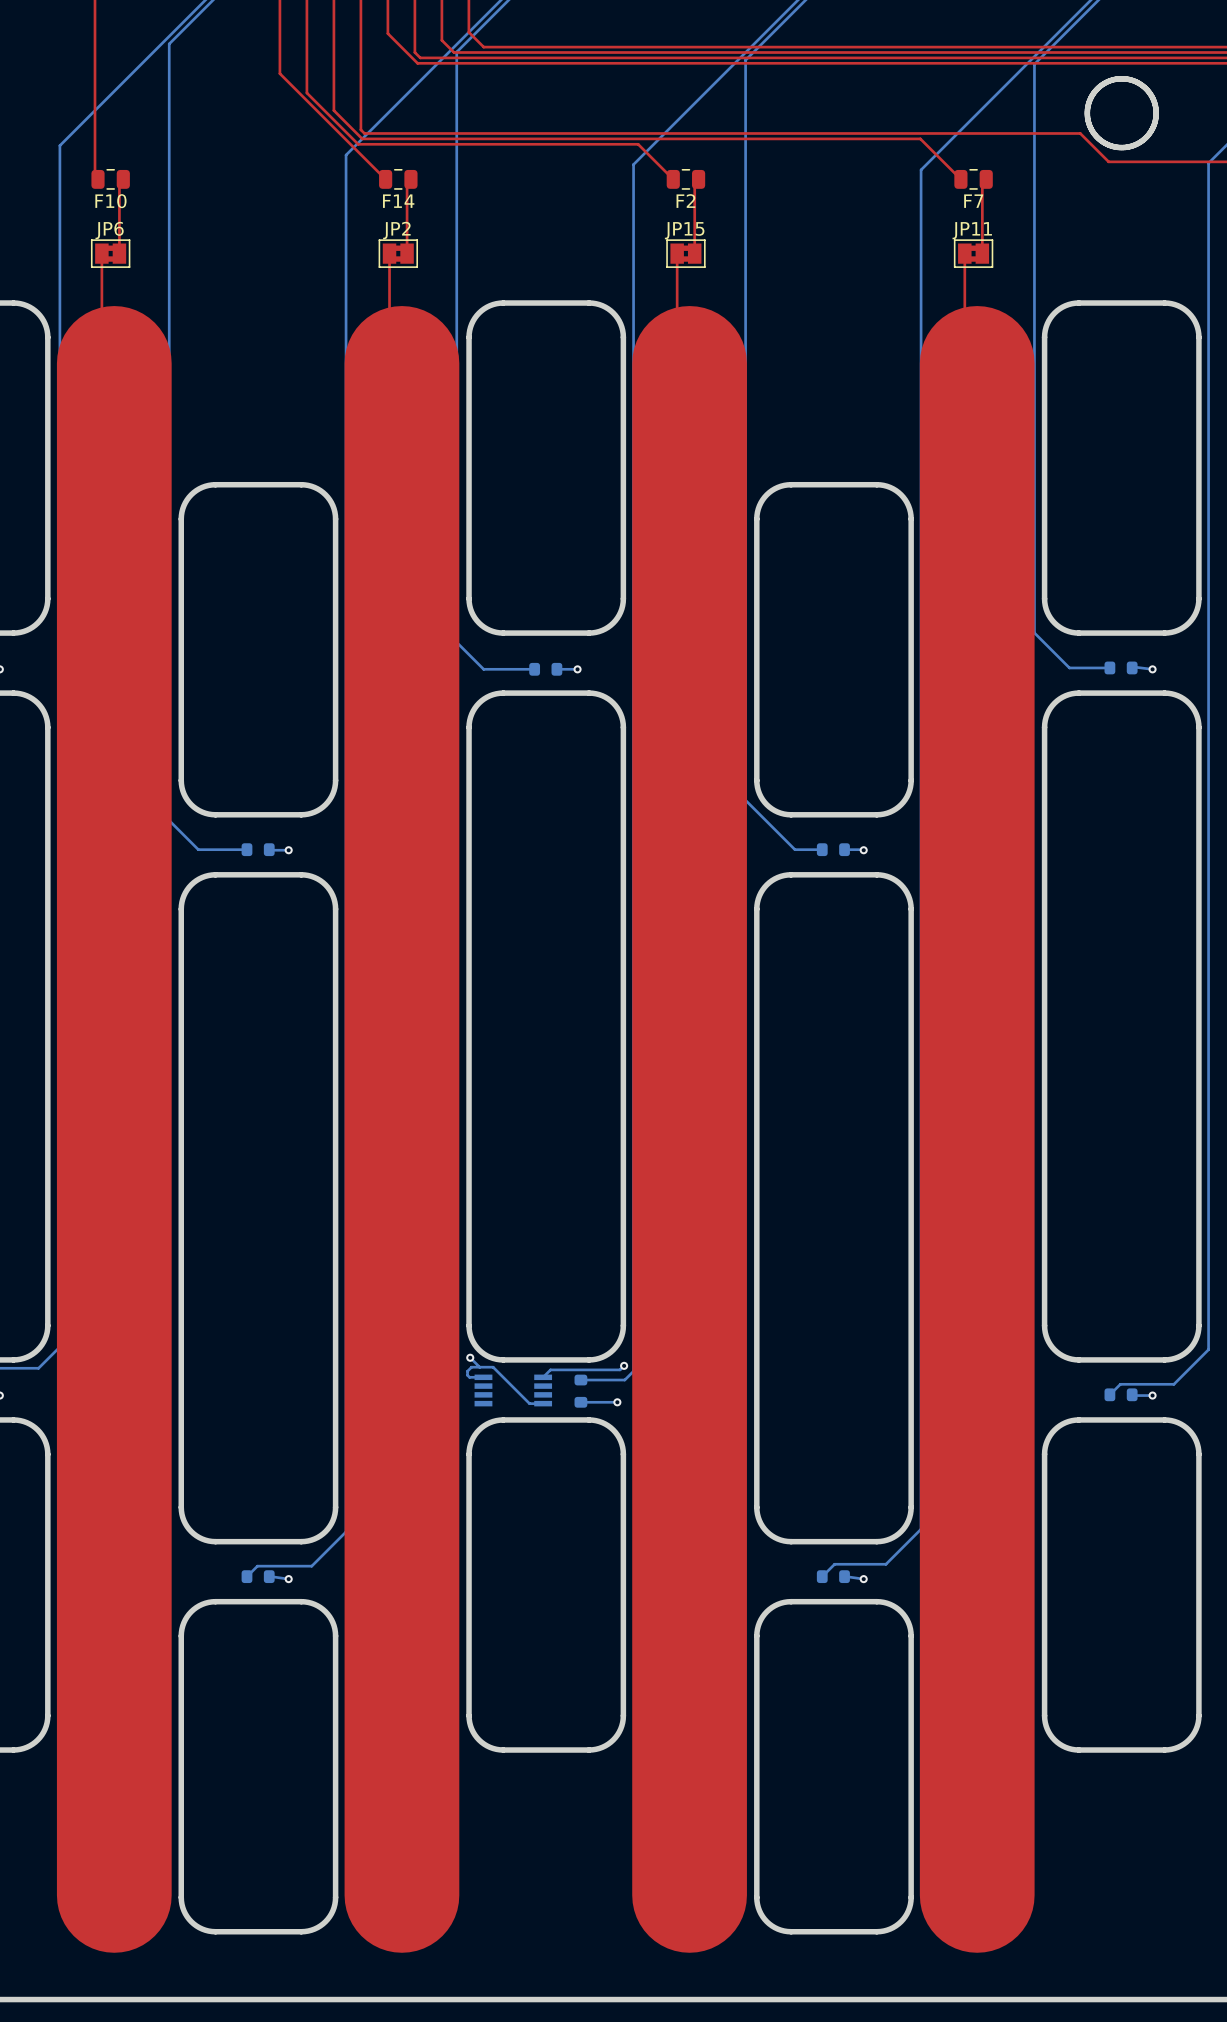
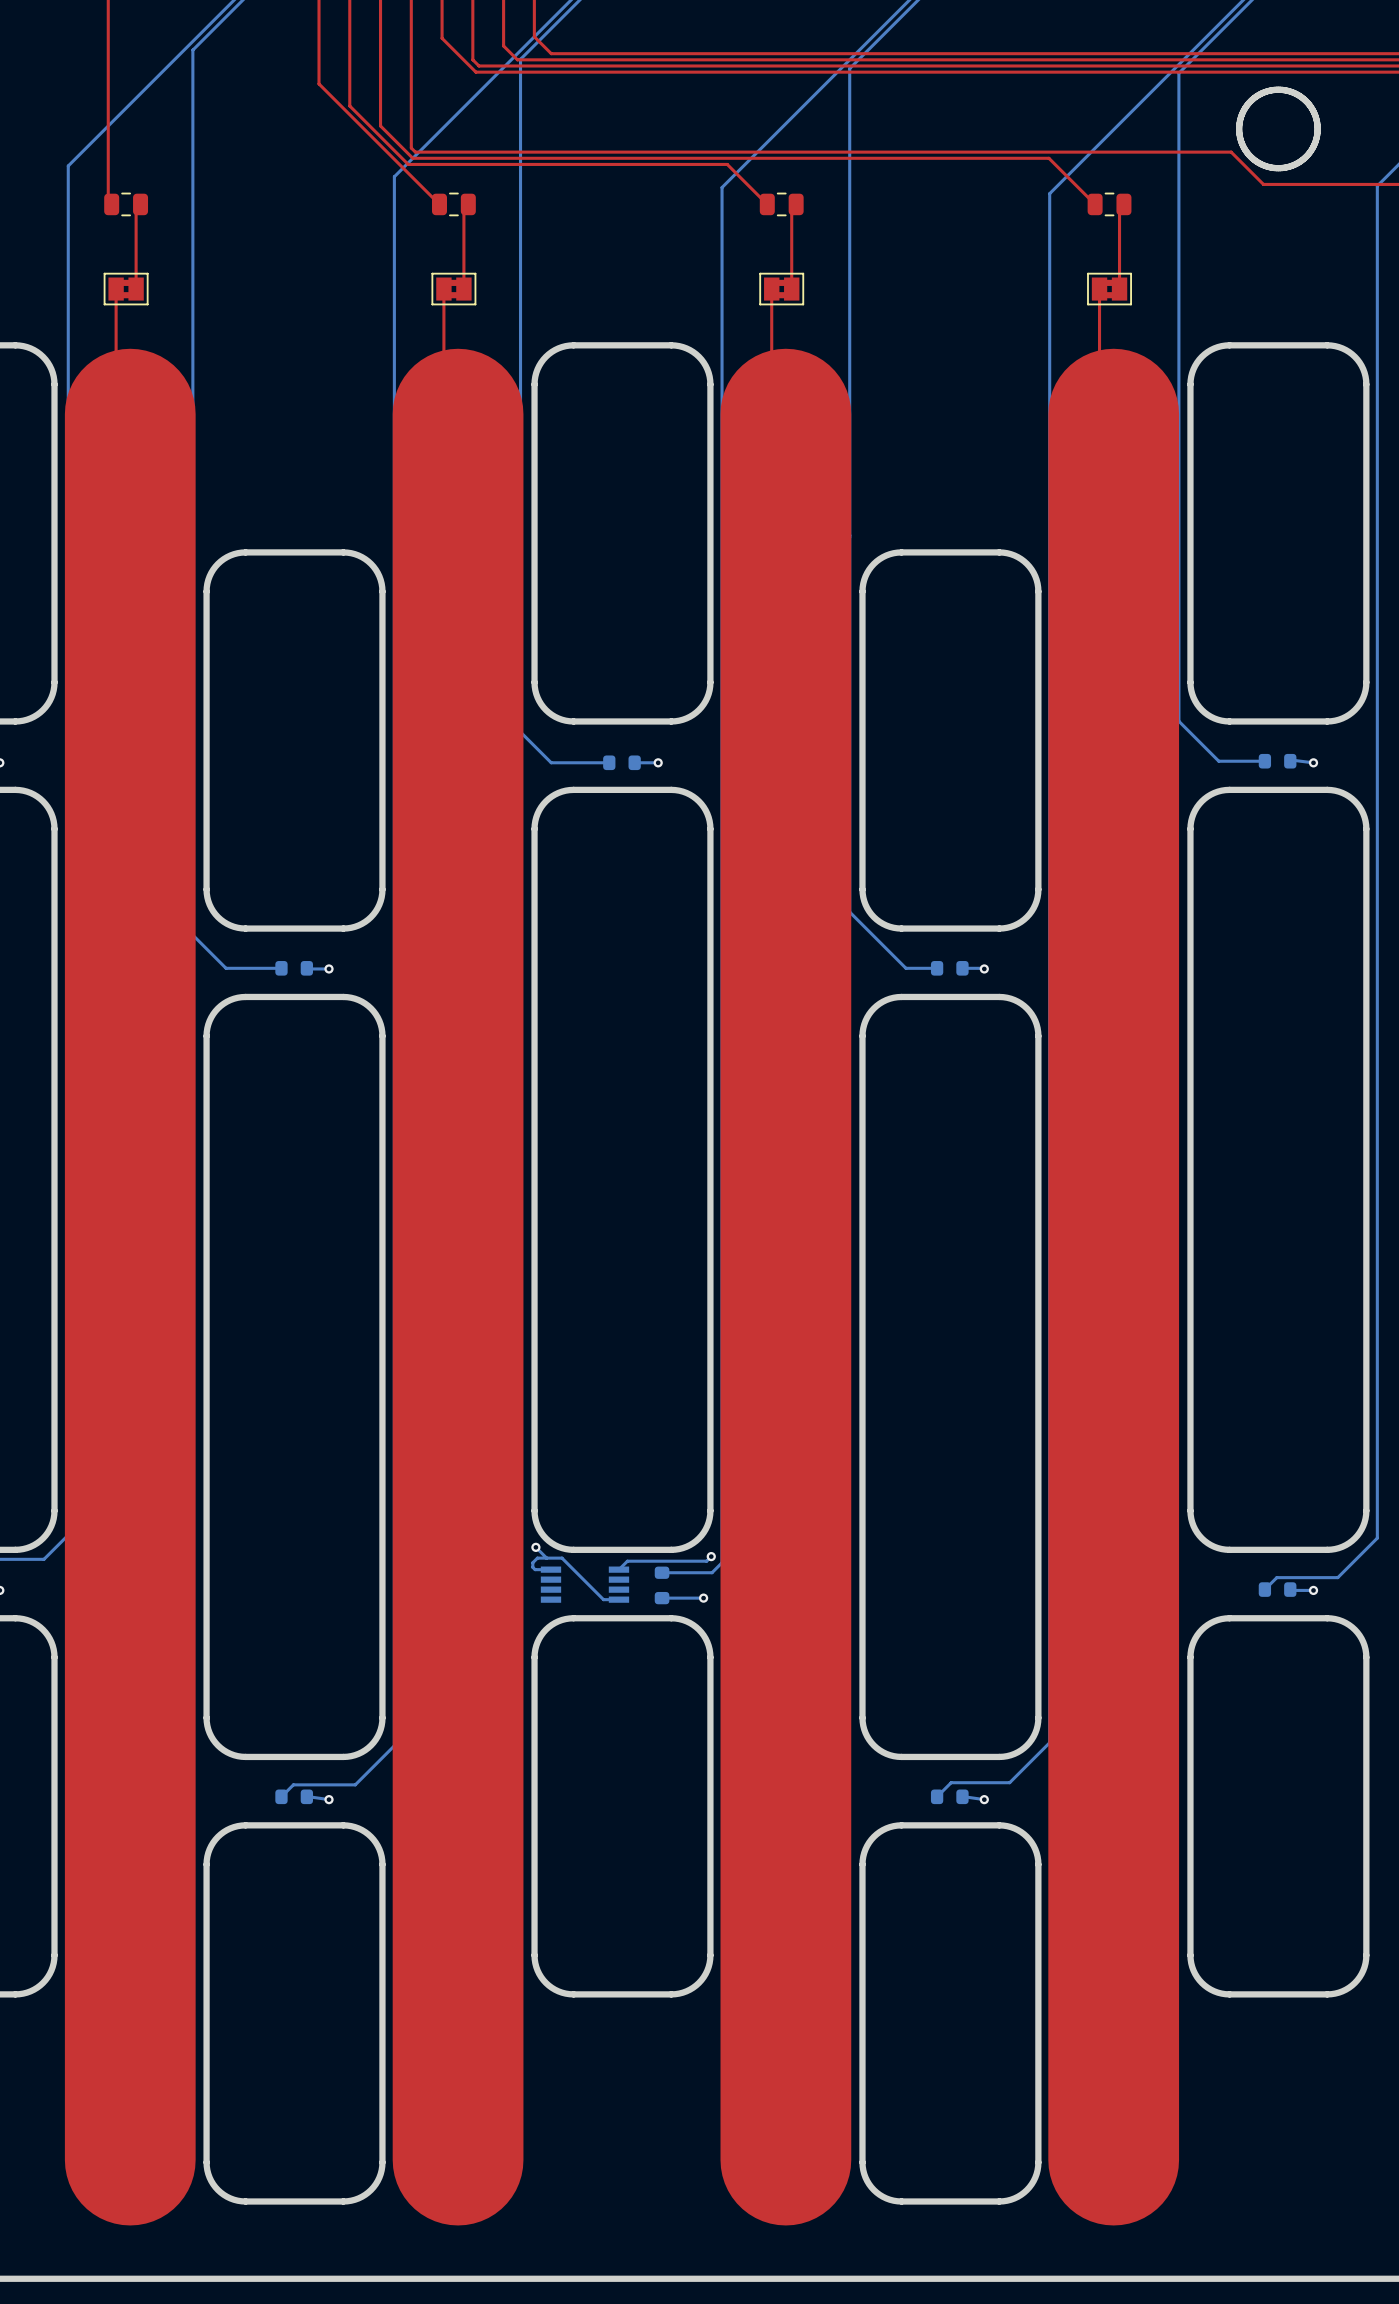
F10 name: F10 (110, 201) -> none
F14 name: F14 (398, 201) -> none
F2 name: F2 (685, 201) -> none
F7 name: F7 (973, 201) -> none
JP6 name: JP6 (109, 230) -> none
JP2 name: JP2 (396, 230) -> none
JP15 name: JP15 (684, 230) -> none
JP11 name: JP11 (972, 230) -> none

